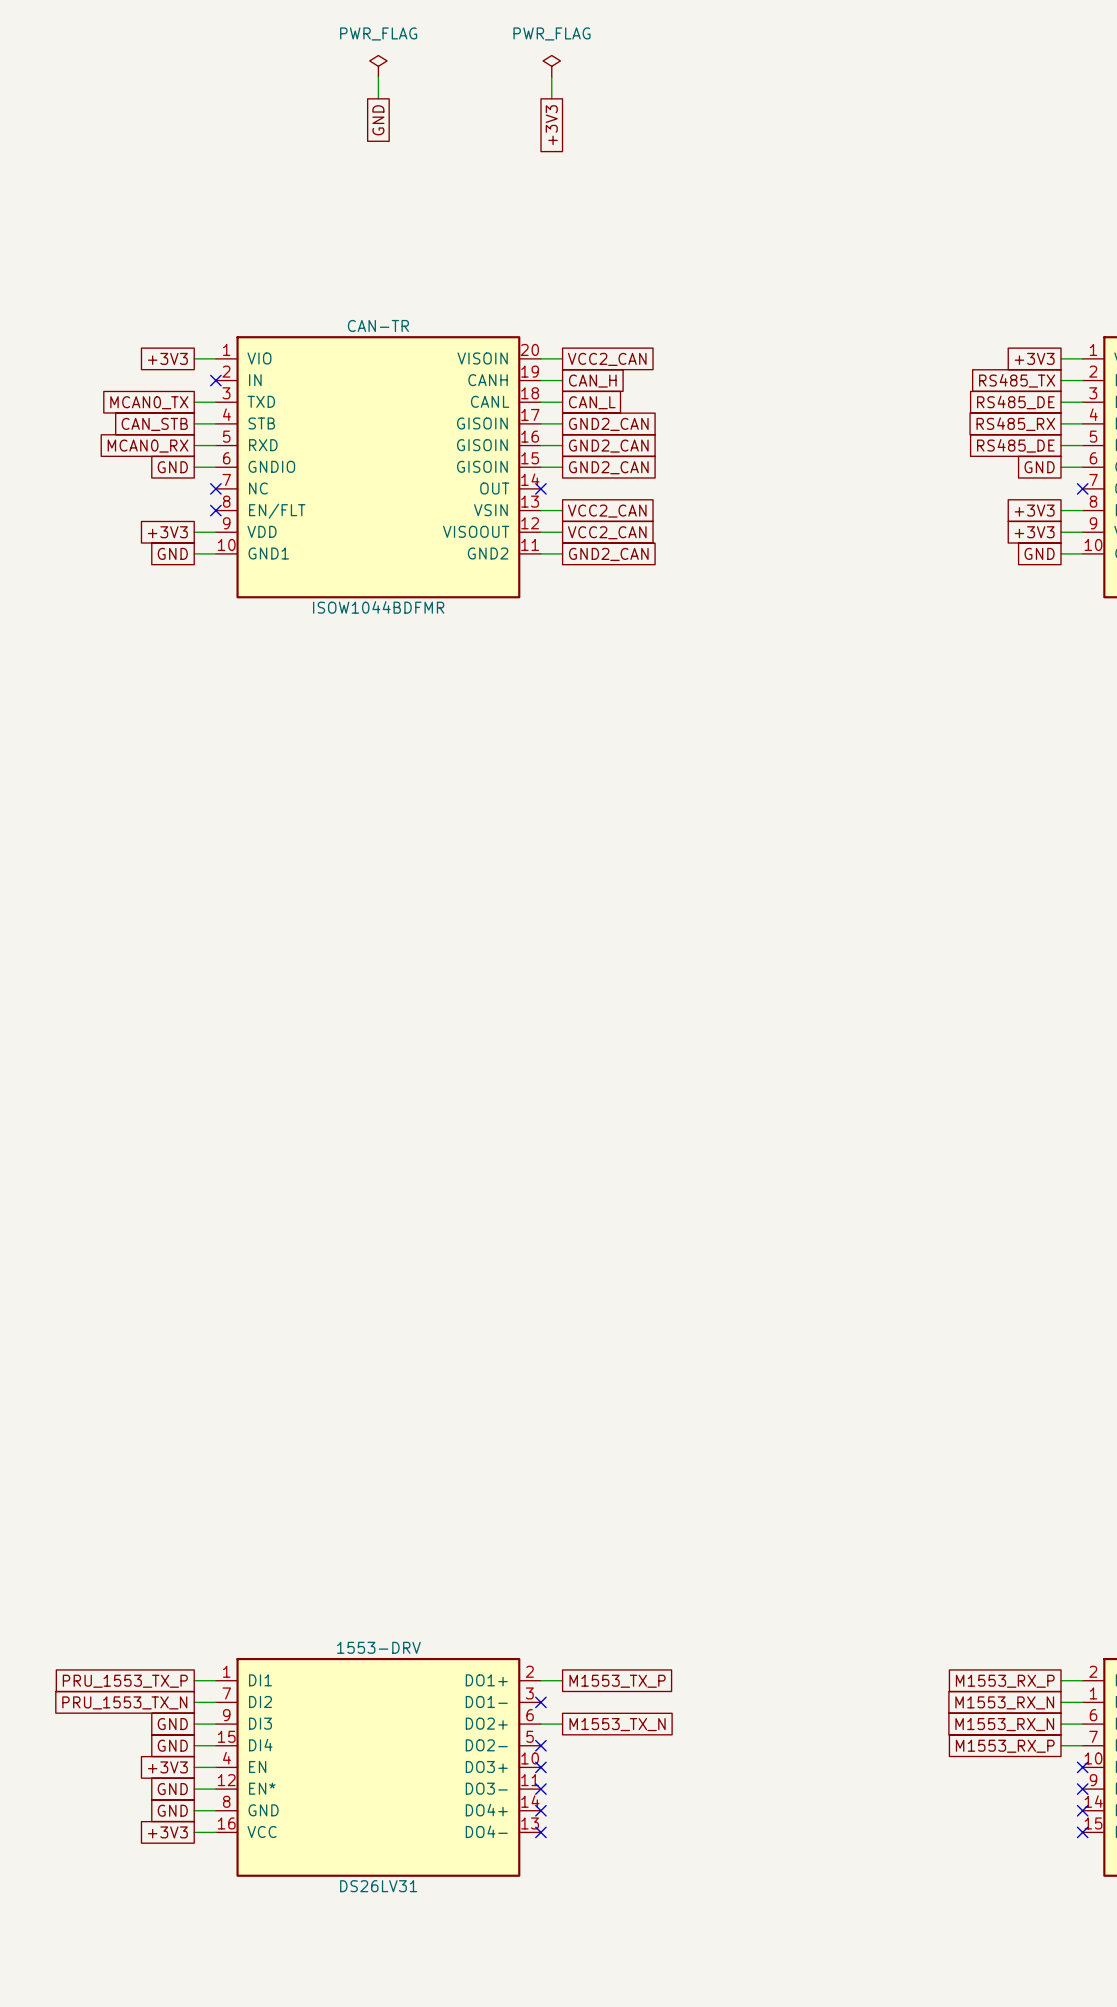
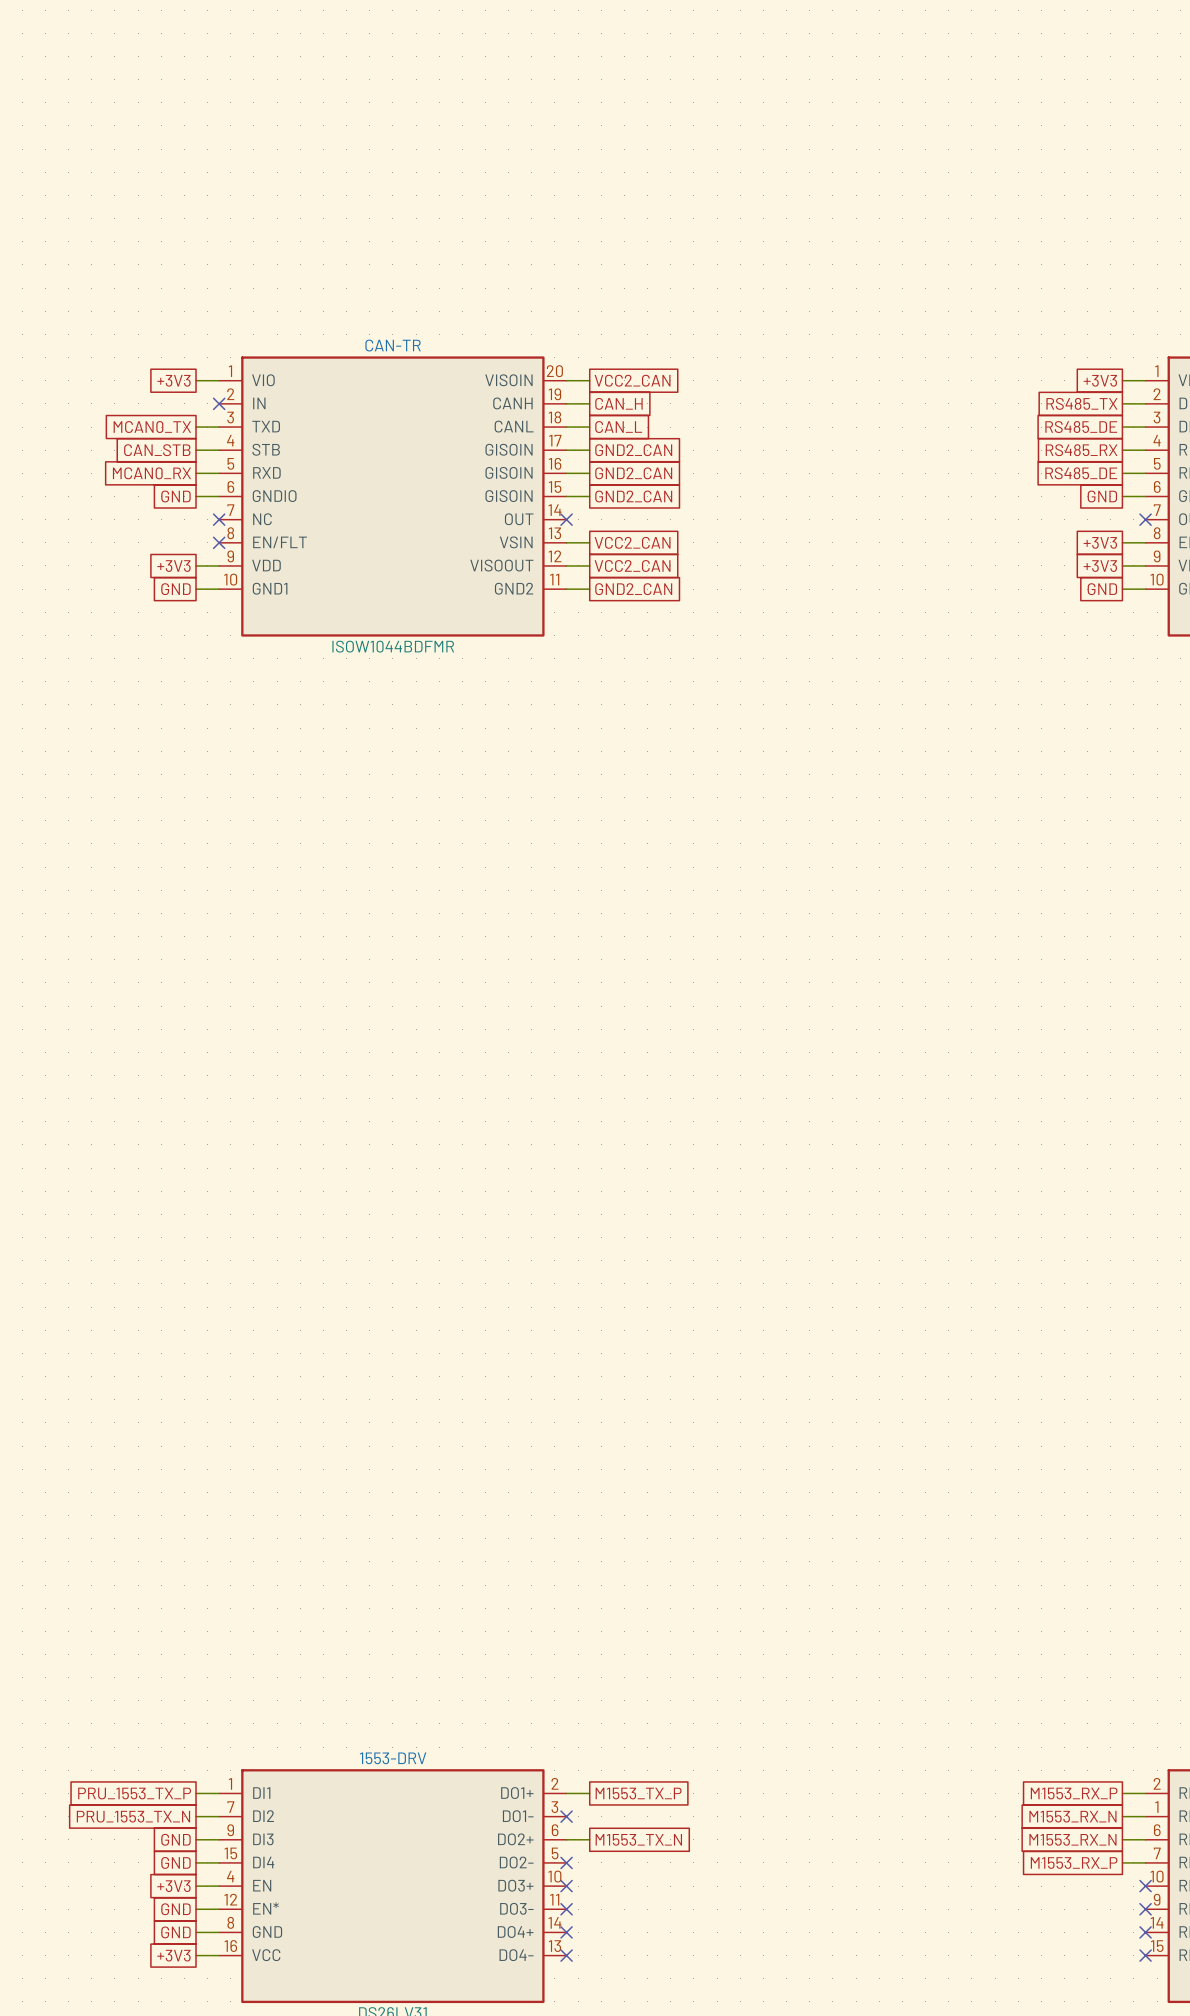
power symbol: PWR_FLAG (378, 66) -> none
power symbol: PWR_FLAG (551, 66) -> none
wire: (378, 77) (378, 98) -> none
wire: (551, 77) (551, 98) -> none
global label: GND (378, 120) -> none
global label: +3V3 (551, 125) -> none

